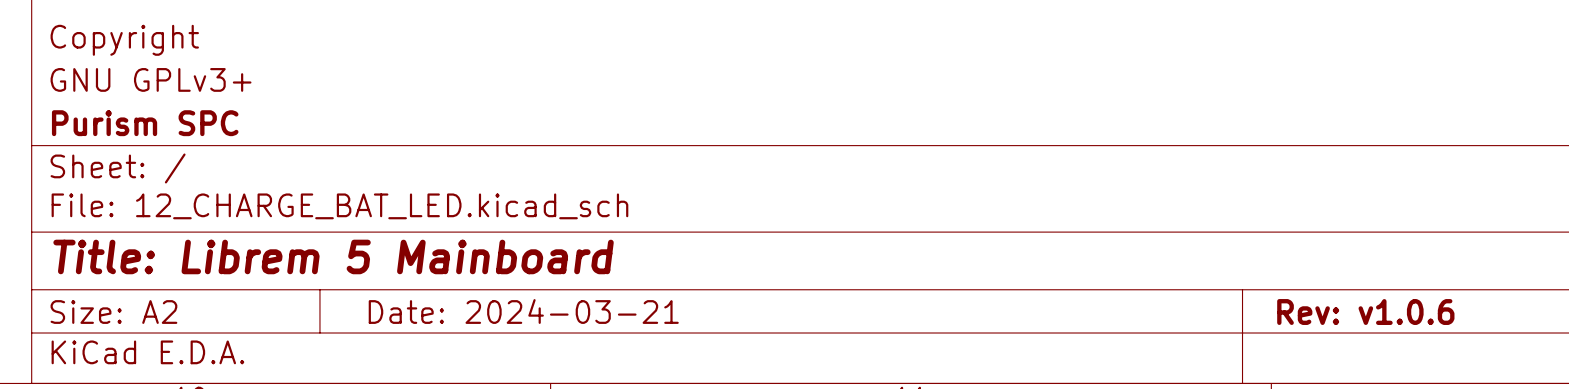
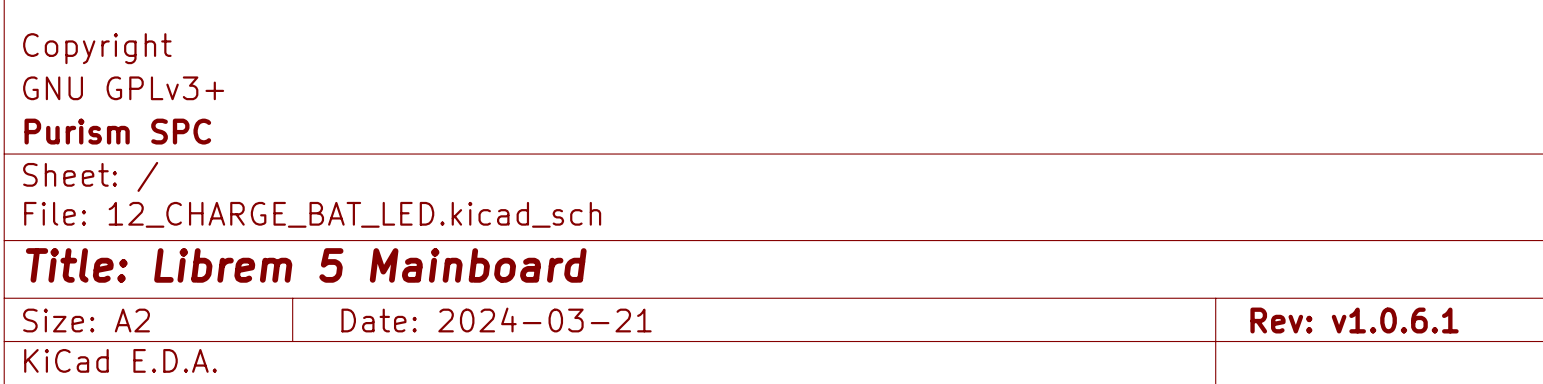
title block: Rev: v1.0.6 (1365, 312) -> Rev: v1.0.6.1 (1354, 320)

